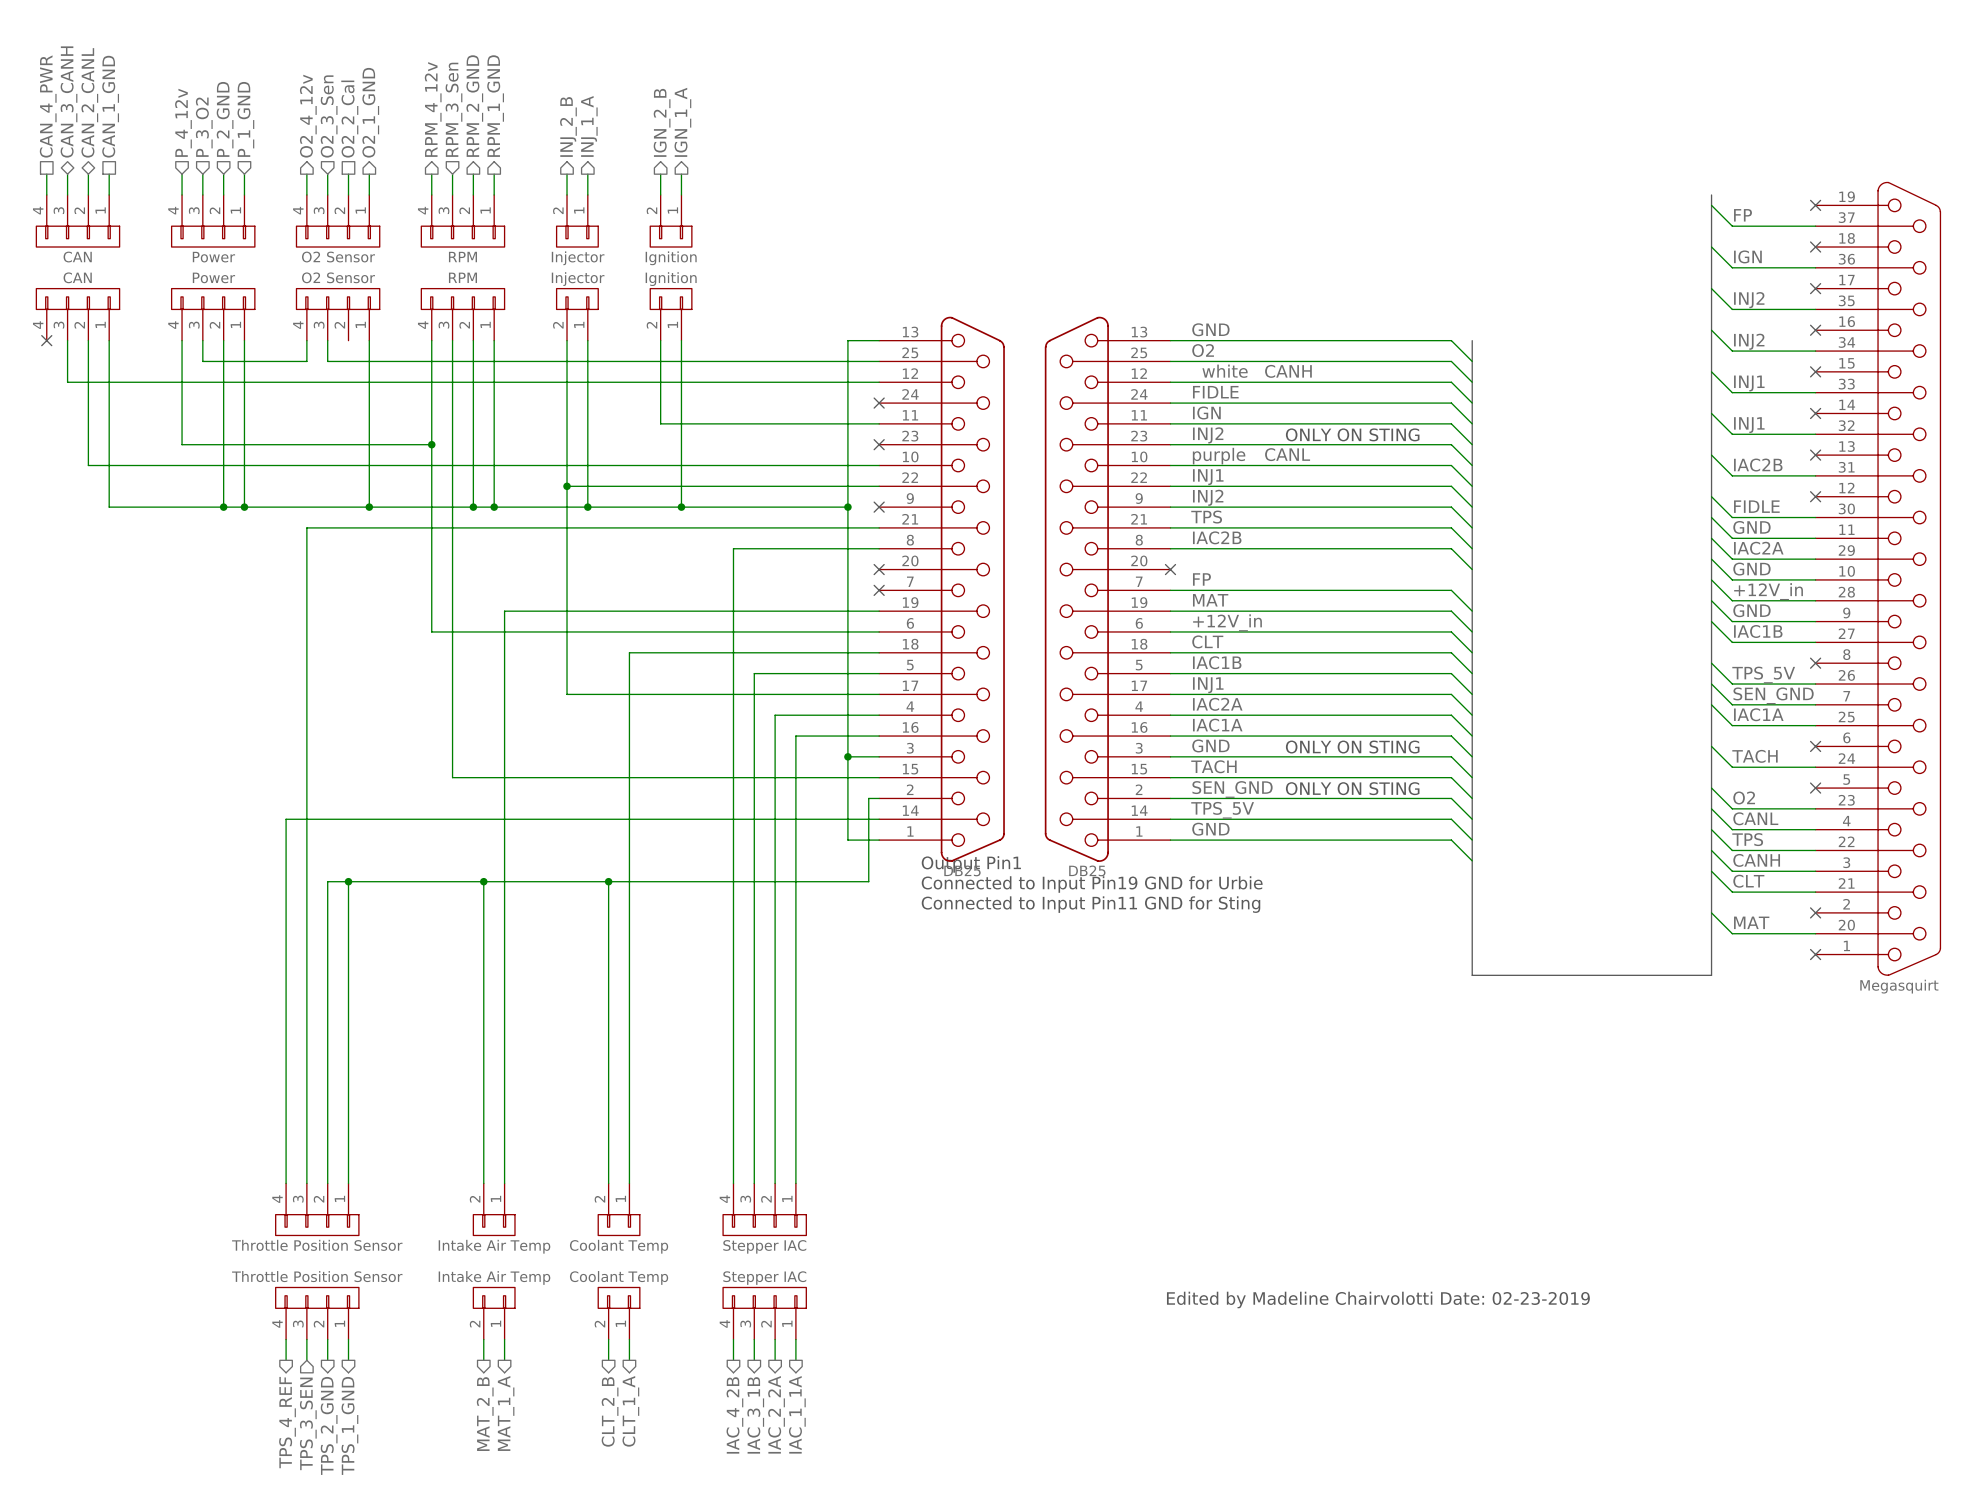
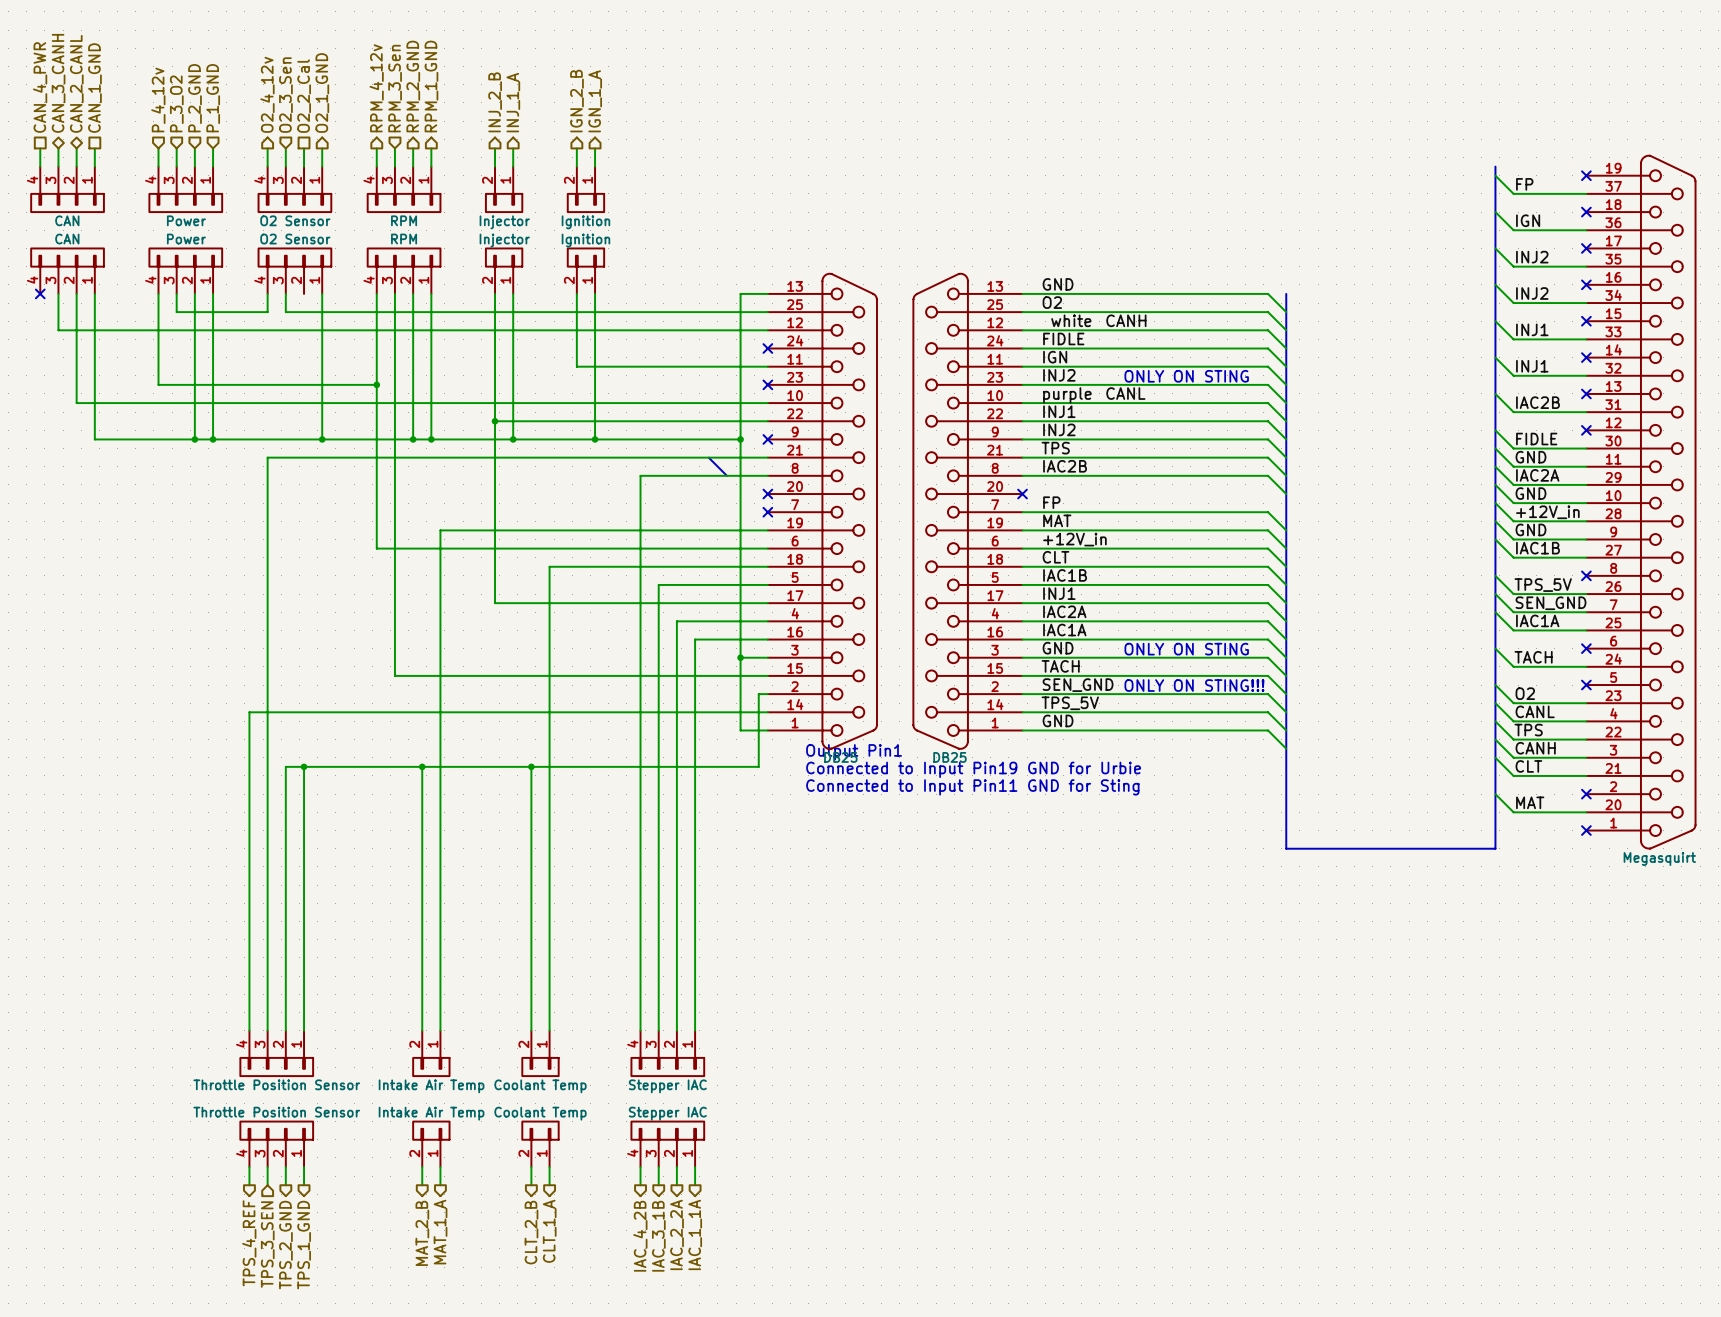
bus: none -> (708, 457) (726, 475)
text: ONLY ON STING (1352, 788) -> ONLY ON STING!!! (1194, 685)
text: Edited by Madeline Chairvolotti Date: 02-23-2019 (1378, 1299) -> none

